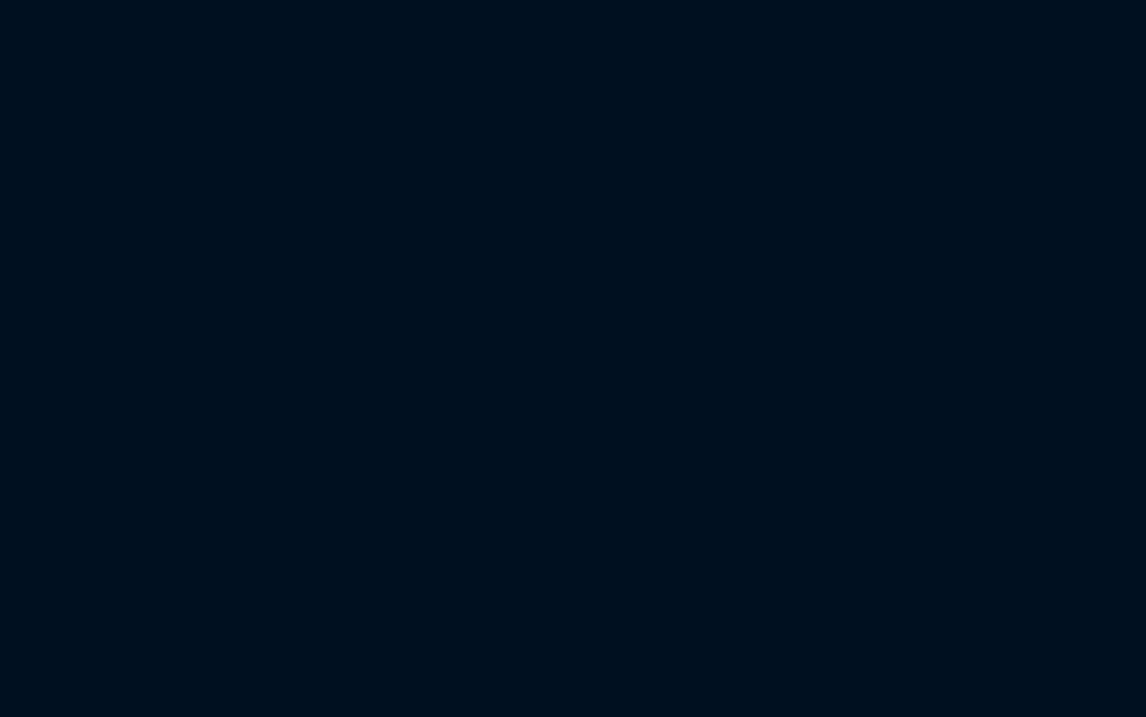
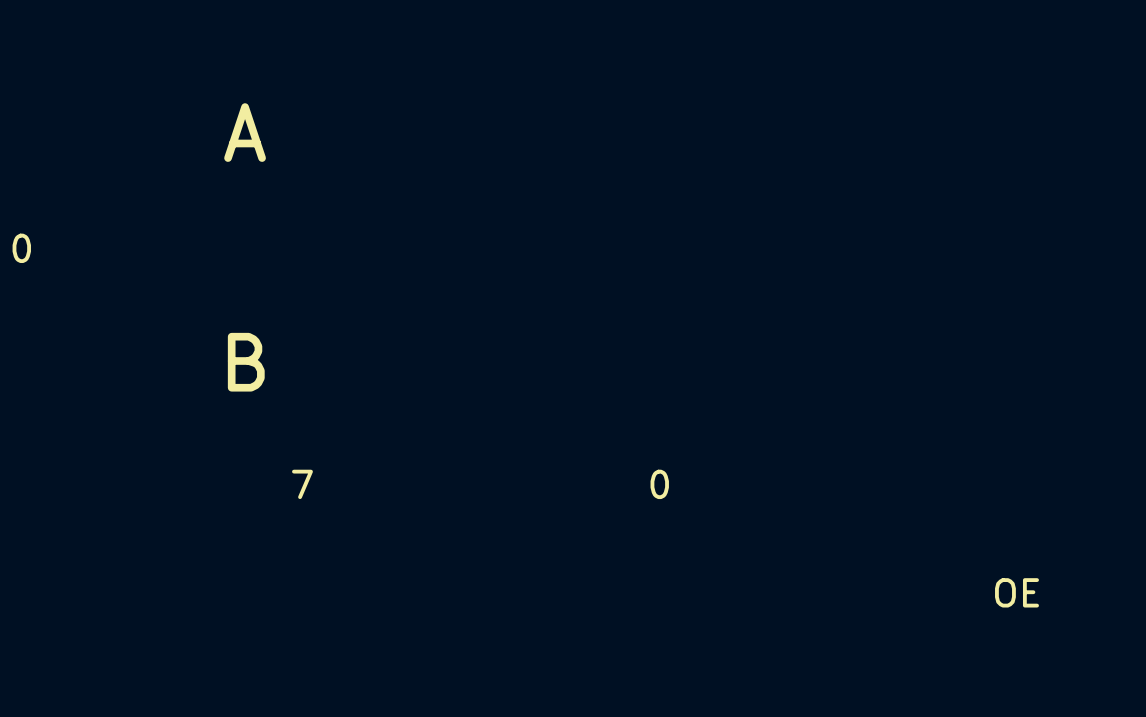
text: none -> A (245, 132)
text: none -> 0 (21, 248)
text: none -> B (246, 362)
text: none -> 7 (302, 484)
text: none -> 0 (659, 484)
text: none -> OE (1016, 592)

